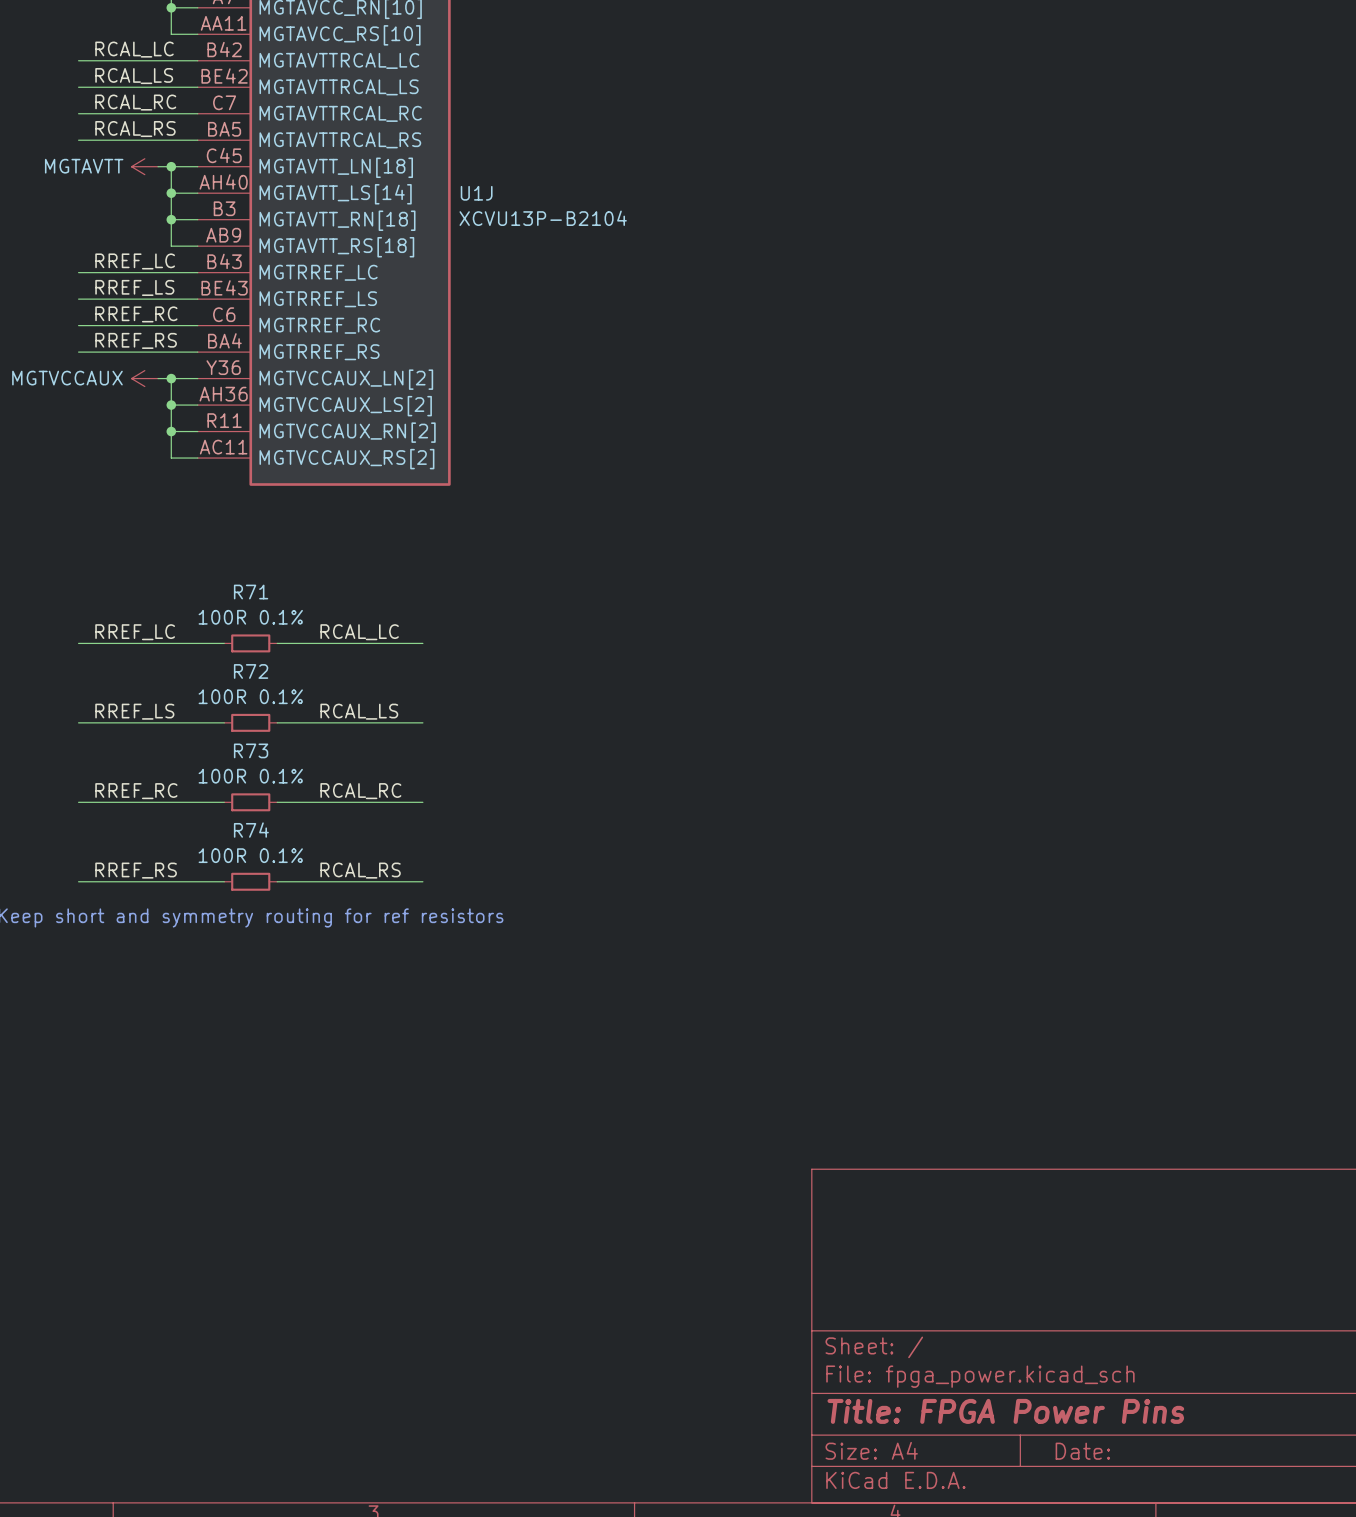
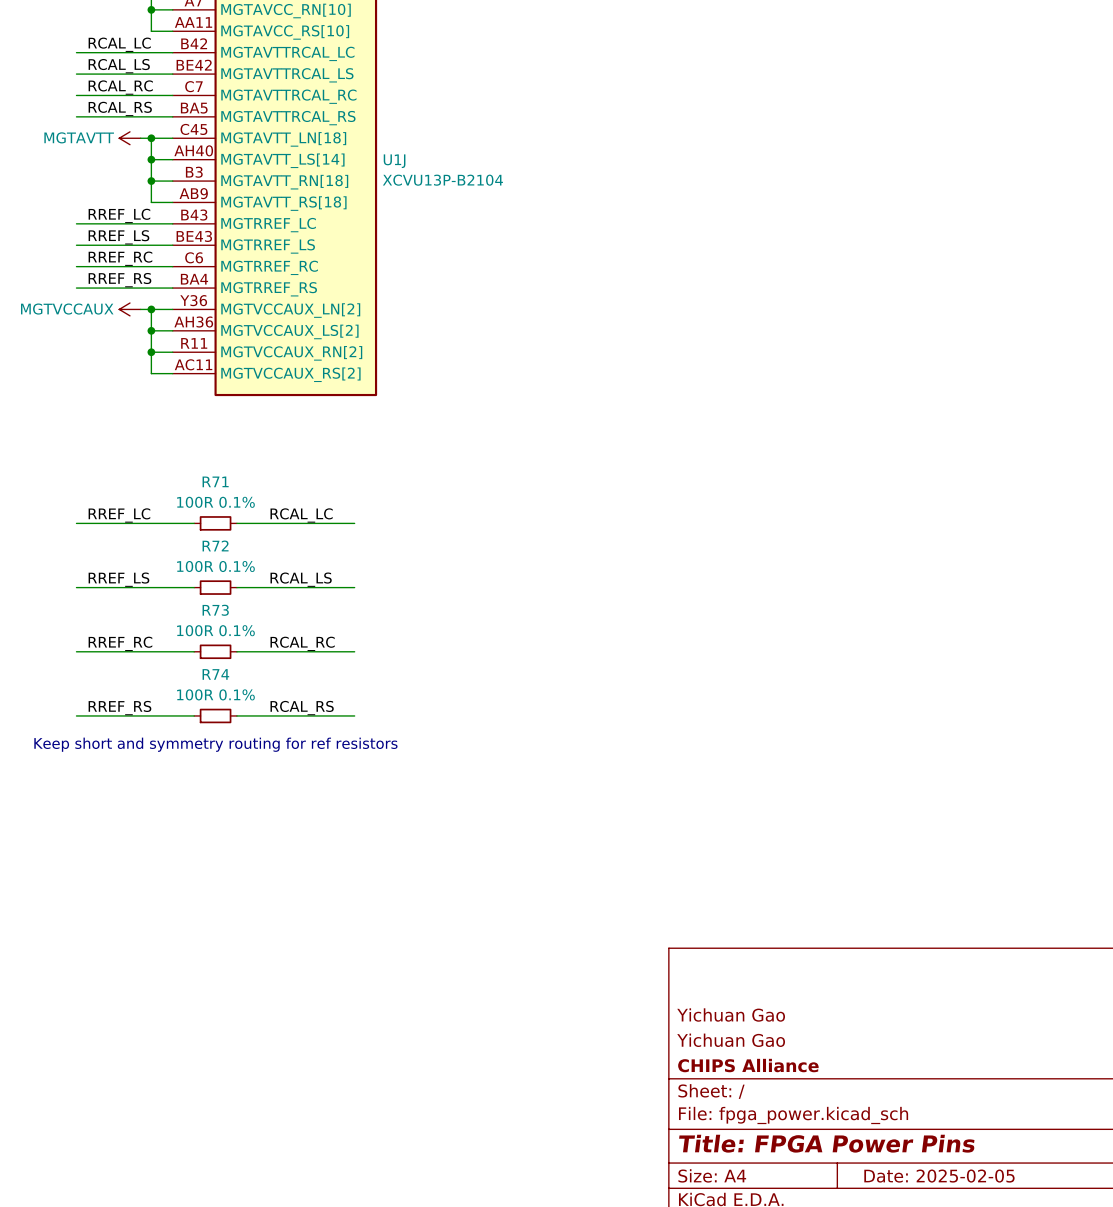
title block: none -> Yichuan Gao (731, 1015)
title block: none -> Yichuan Gao (731, 1040)
title block: none -> CHIPS Alliance (748, 1065)
title block: Date: (1082, 1451) -> Date: 2025-02-05 (939, 1176)

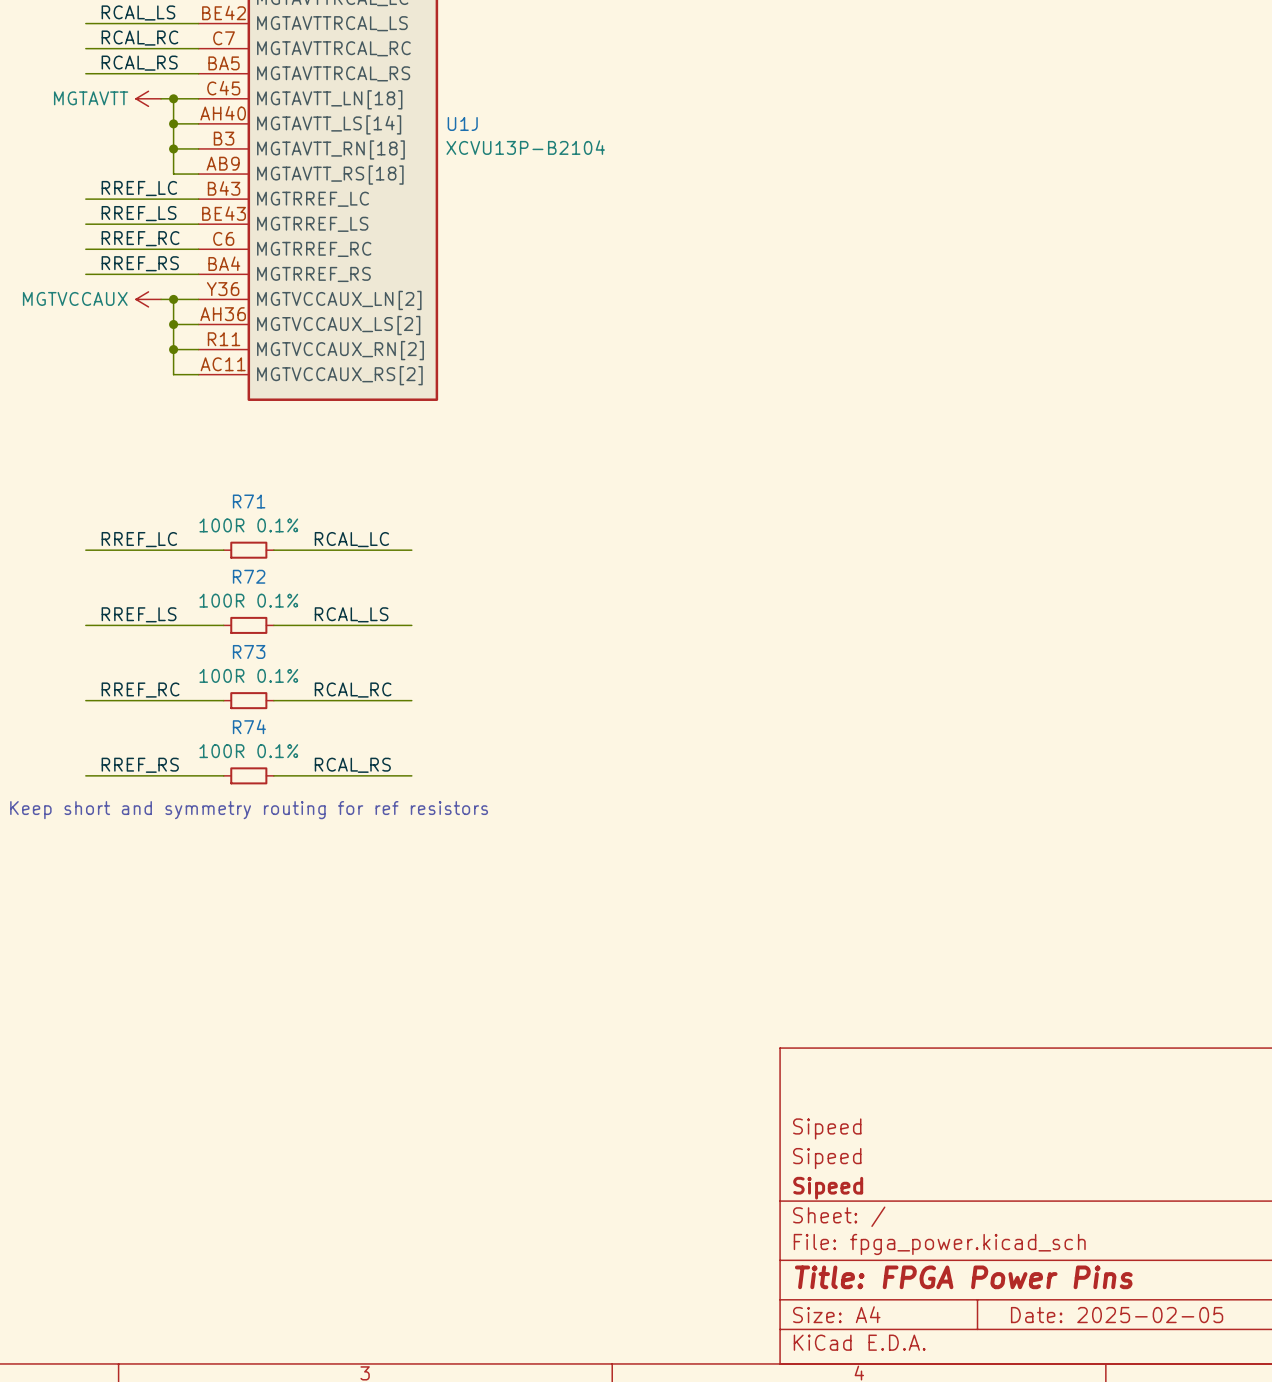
title block: Yichuan Gao (731, 1015) -> Sipeed (827, 1128)
title block: Yichuan Gao (731, 1040) -> Sipeed (827, 1158)
title block: CHIPS Alliance (748, 1065) -> Sipeed (828, 1188)

